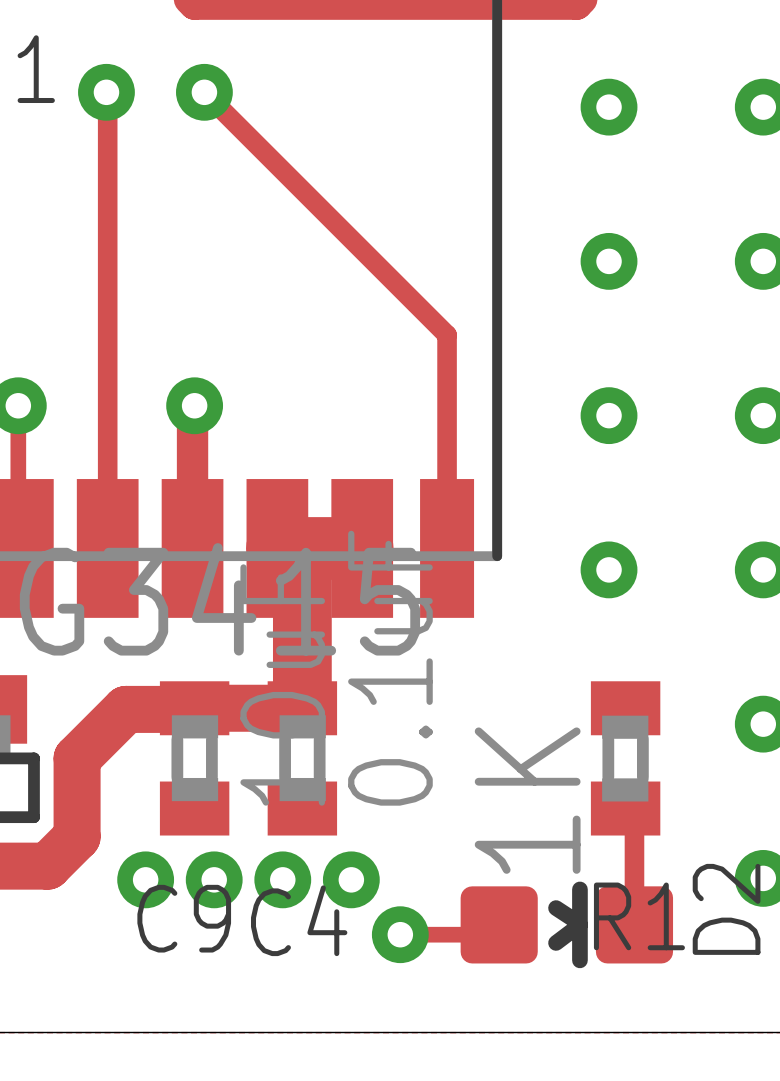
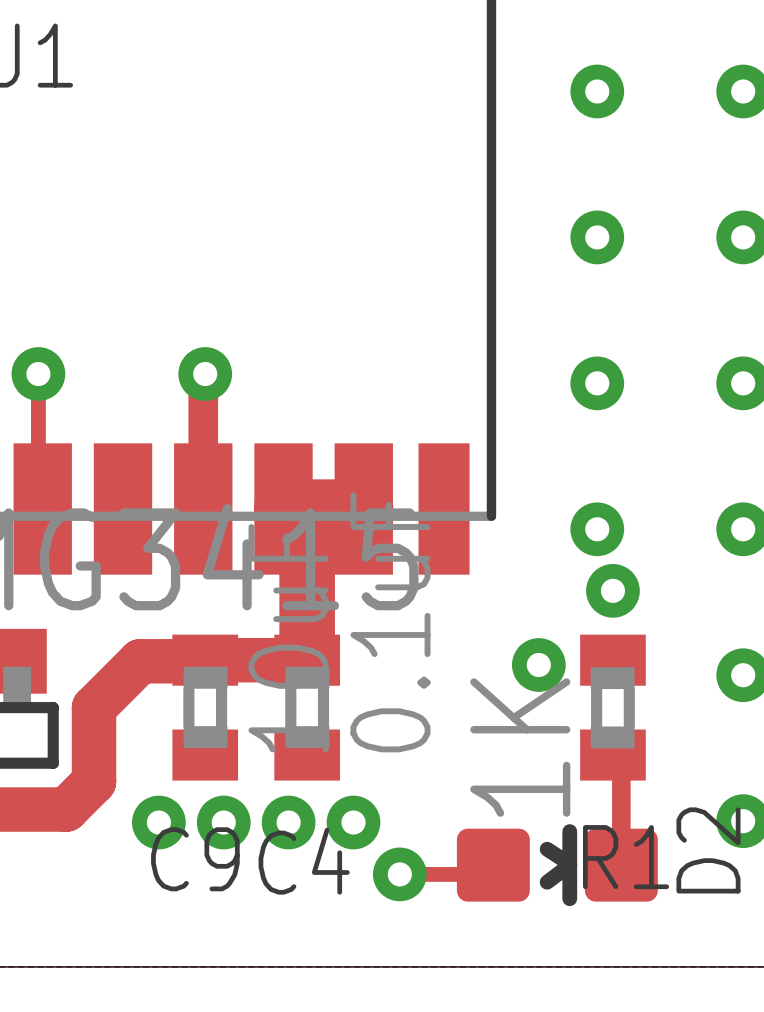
track: (106, 92) (107, 548) -> none
via: (106, 92) -> none
track: (204, 92) (447, 334) (447, 548) -> none
via: (204, 92) -> none
via: none -> (612, 590)
via: none -> (538, 664)

